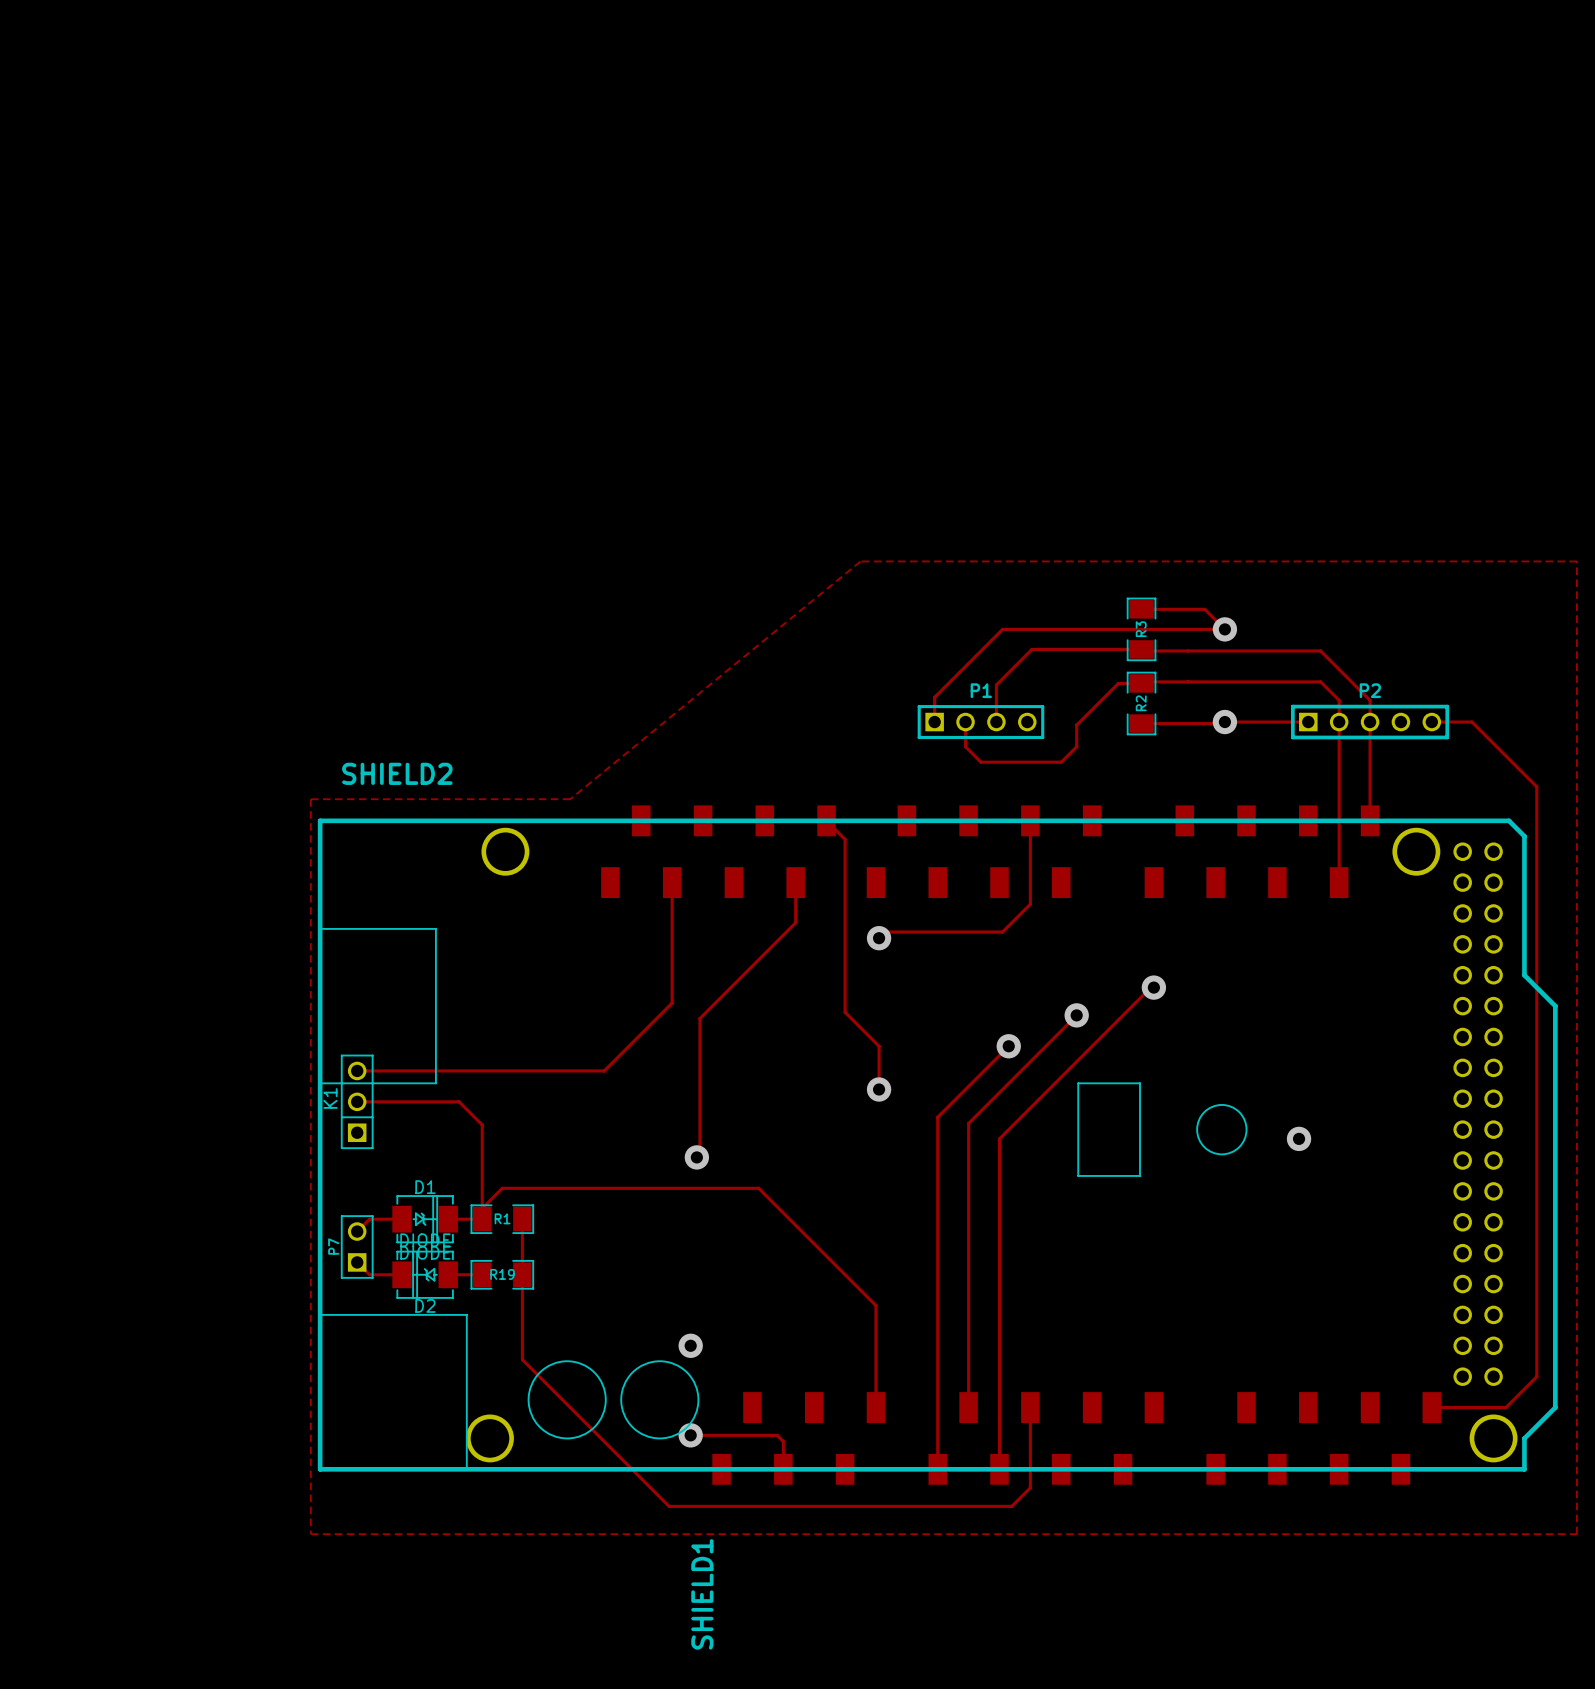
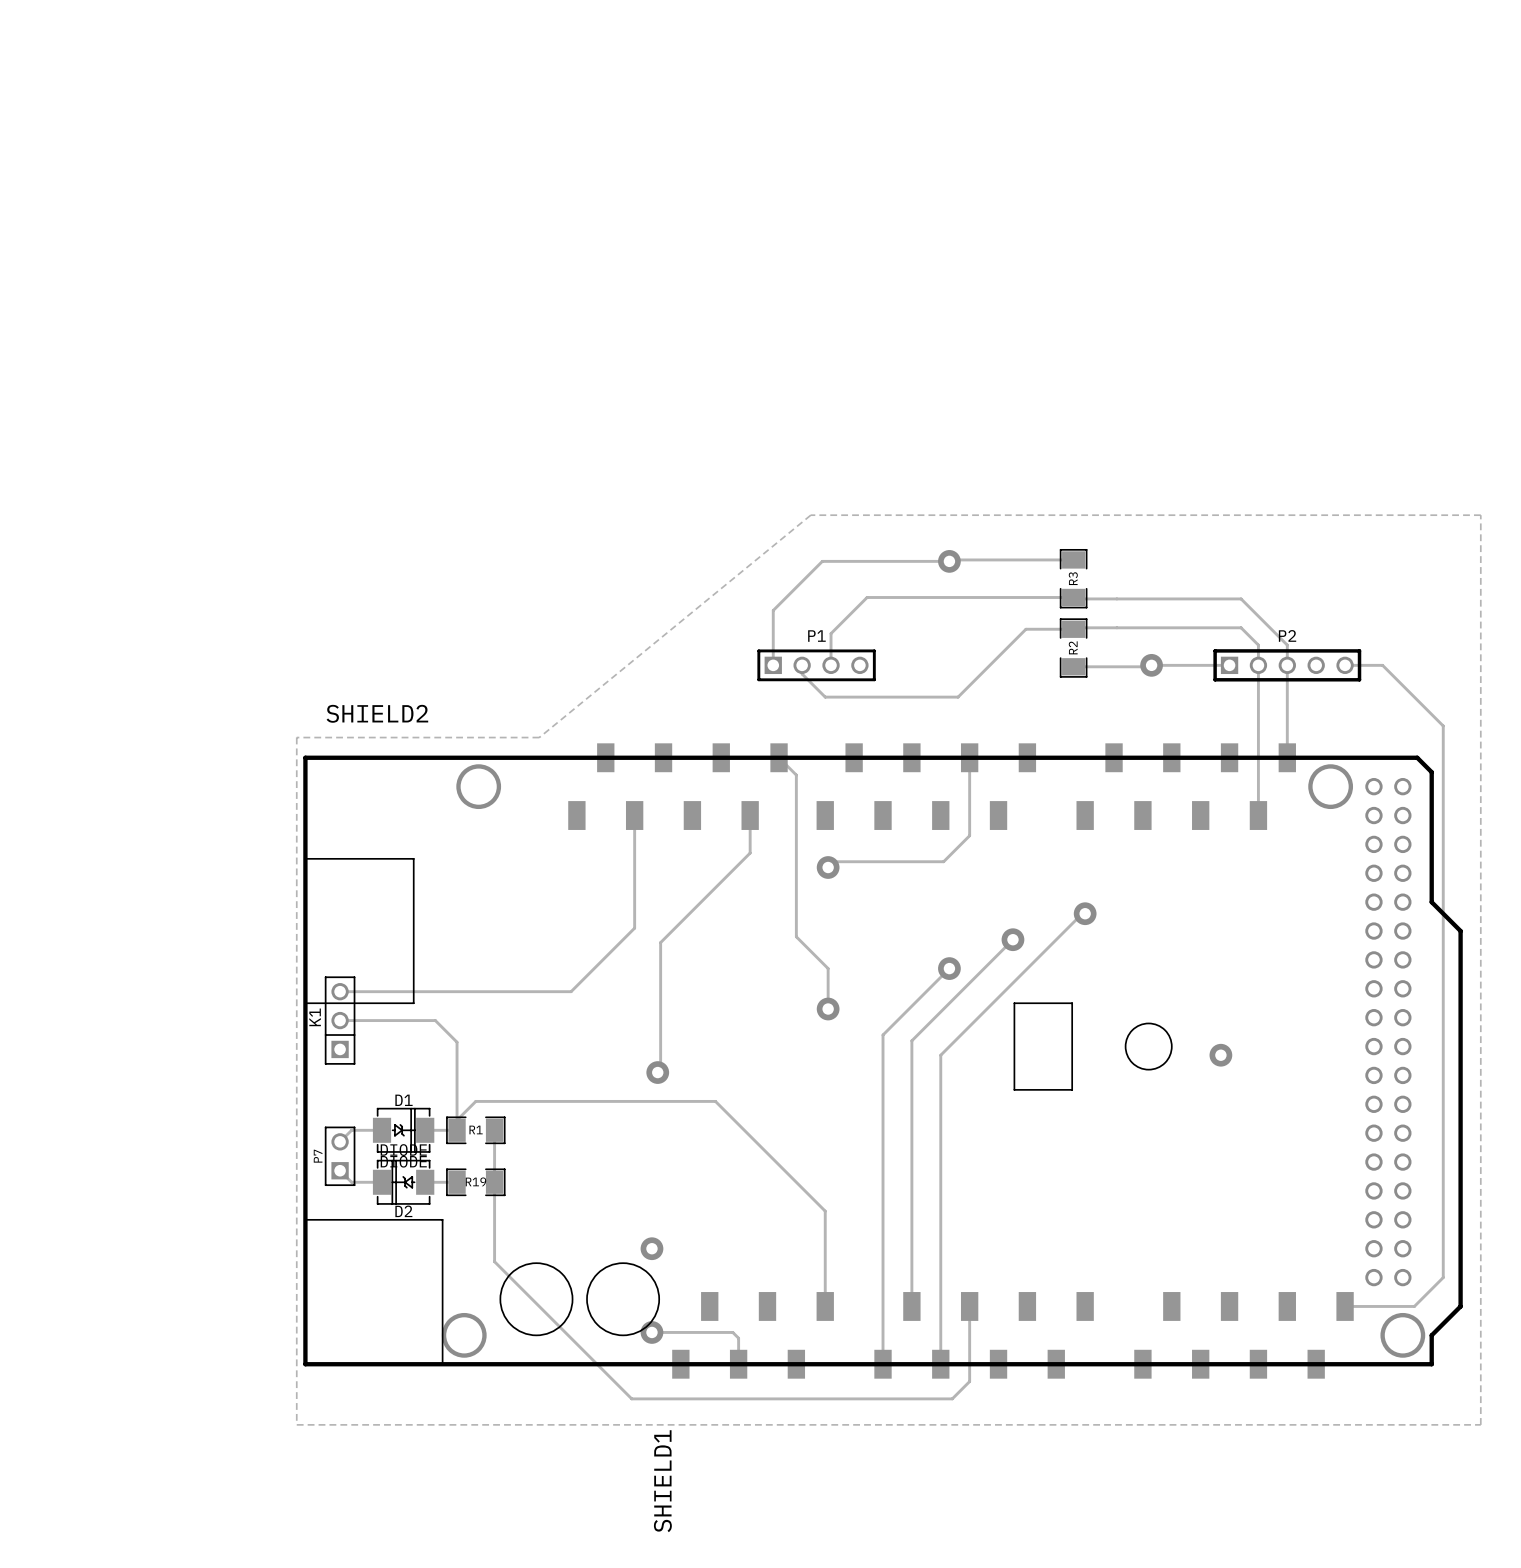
track: (1141, 609) (1204, 609) (1224, 629) (1002, 629) (934, 697) (934, 722) -> (1073, 559) (822, 561) (773, 610) (773, 665)
via: none -> (949, 561)
via: (1224, 629) -> none
track: (1031, 649) (996, 684) (996, 722) -> (971, 597) (867, 597) (831, 633) (831, 665)
track: (1118, 683) (1076, 725) (1076, 746) (1061, 762) (980, 762) (965, 746) (965, 722) -> (1051, 629) (1025, 629) (958, 697) (825, 697) (802, 674) (802, 665)
P1 position: (980, 722) -> (816, 665)

